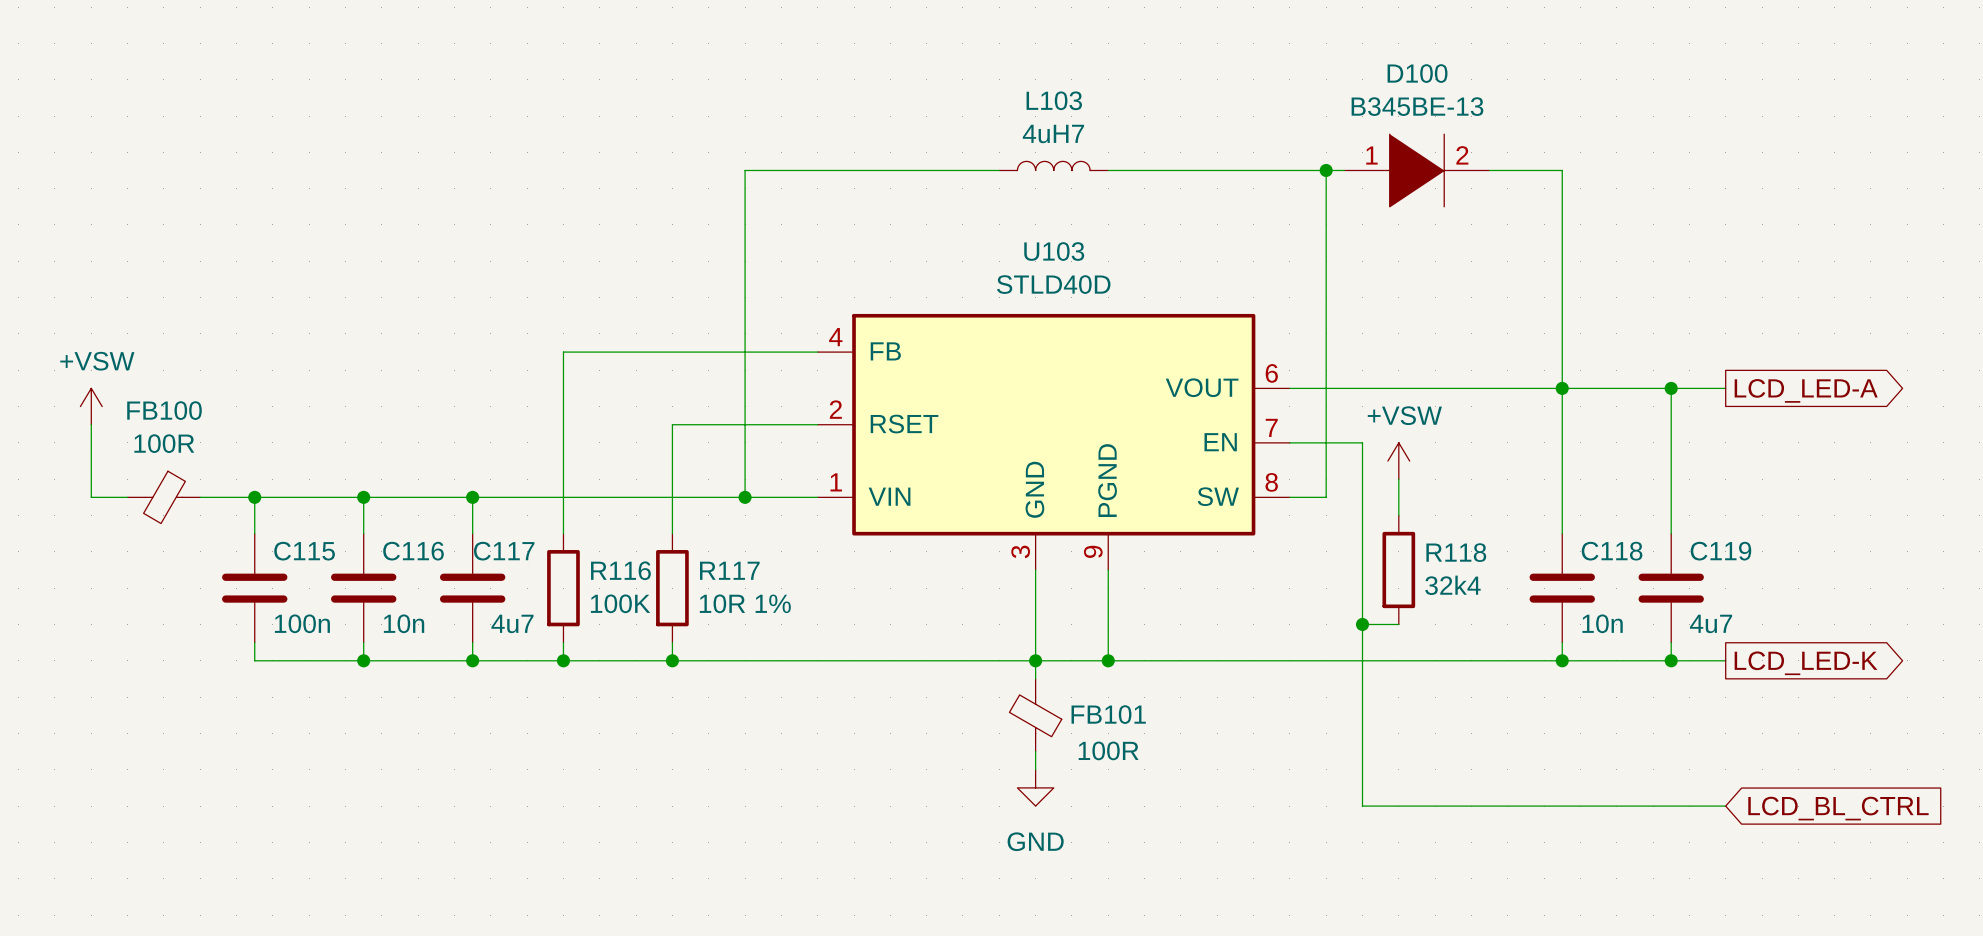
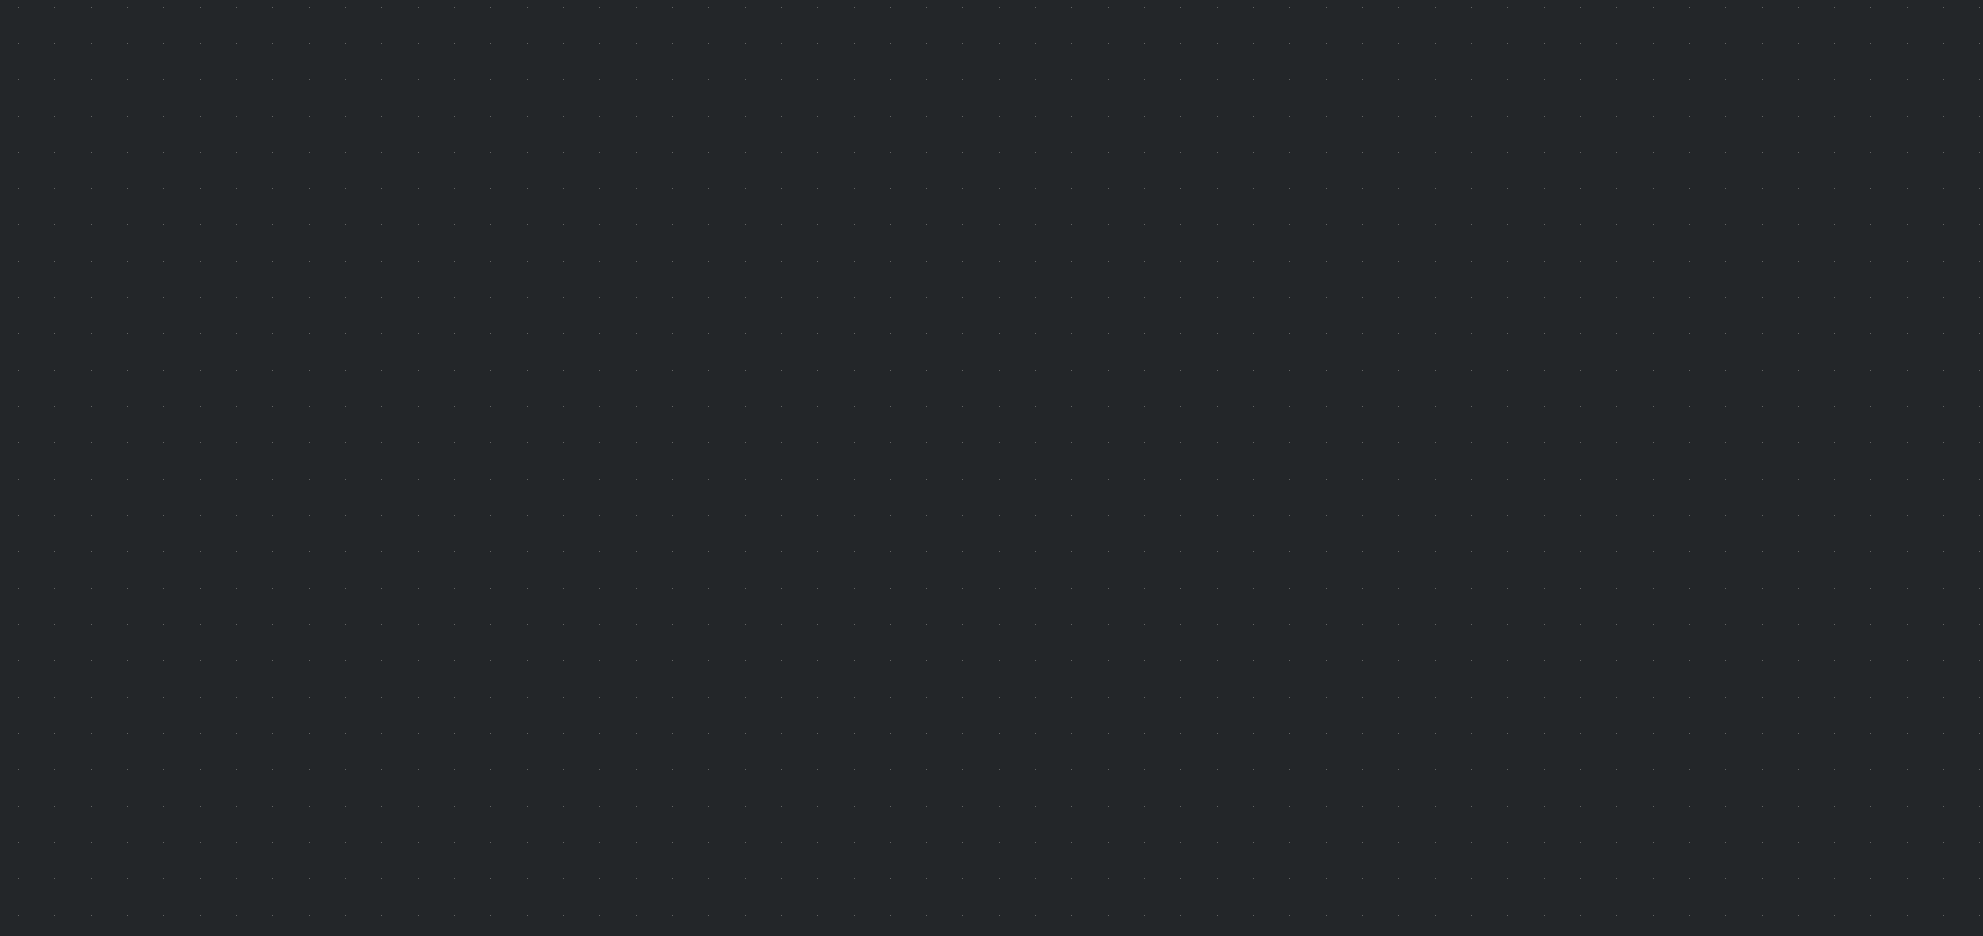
L103: 4uH7 (1053, 165) -> none
wire: (999, 170) (745, 170) (745, 497) -> none
wire: (1108, 170) (1344, 170) -> none
wire: (1326, 170) (1326, 497) (1289, 497) -> none
junction: (1326, 170) -> none
D100: B345BE-13 (1416, 170) -> none
wire: (1489, 170) (1562, 170) (1562, 533) -> none
wire: (817, 352) (563, 352) (563, 533) -> none
wire: (1289, 388) (1725, 388) -> none
junction: (1562, 388) -> none
wire: (1671, 388) (1671, 533) -> none
junction: (1671, 388) -> none
global label: LCD_LED-A (1806, 390) -> none
power symbol: +VSW (91, 406) -> none
wire: (91, 424) (91, 497) (127, 497) -> none
wire: (817, 424) (672, 424) (672, 533) -> none
U103: STLD40D (1053, 441) -> none
wire: (1289, 442) (1362, 442) (1362, 806) (1725, 806) -> none
power symbol: +VSW (1398, 461) -> none
wire: (1398, 479) (1398, 515) -> none
FB100: 100R (163, 497) -> none
wire: (200, 497) (817, 497) -> none
wire: (254, 497) (254, 533) -> none
junction: (254, 497) -> none
wire: (363, 497) (363, 533) -> none
junction: (363, 497) -> none
wire: (472, 497) (472, 533) -> none
junction: (472, 497) -> none
junction: (745, 497) -> none
wire: (1035, 570) (1035, 678) -> none
wire: (1108, 570) (1108, 660) -> none
R118: 32k4 (1398, 570) -> none
C115: 100n (254, 588) -> none
C116: 10n (363, 588) -> none
C117: 4u7 (472, 588) -> none
R116: 100K (563, 588) -> none
R117: 10R 1% (672, 588) -> none
C118: 10n (1562, 588) -> none
C119: 4u7 (1671, 588) -> none
wire: (1362, 624) (1398, 624) -> none
junction: (1362, 624) -> none
wire: (254, 642) (254, 660) (1725, 660) -> none
wire: (363, 642) (363, 660) -> none
wire: (472, 642) (472, 660) -> none
wire: (563, 642) (563, 660) -> none
wire: (672, 642) (672, 660) -> none
wire: (1562, 642) (1562, 660) -> none
wire: (1671, 642) (1671, 660) -> none
junction: (363, 660) -> none
junction: (472, 660) -> none
junction: (563, 660) -> none
junction: (672, 660) -> none
junction: (1035, 660) -> none
junction: (1108, 660) -> none
junction: (1562, 660) -> none
junction: (1671, 660) -> none
global label: LCD_LED-K (1806, 663) -> none
FB101: 100R (1035, 715) -> none
wire: (1035, 751) (1035, 769) -> none
power symbol: GND (1035, 787) -> none
global label: LCD_BL_CTRL (1838, 808) -> none

